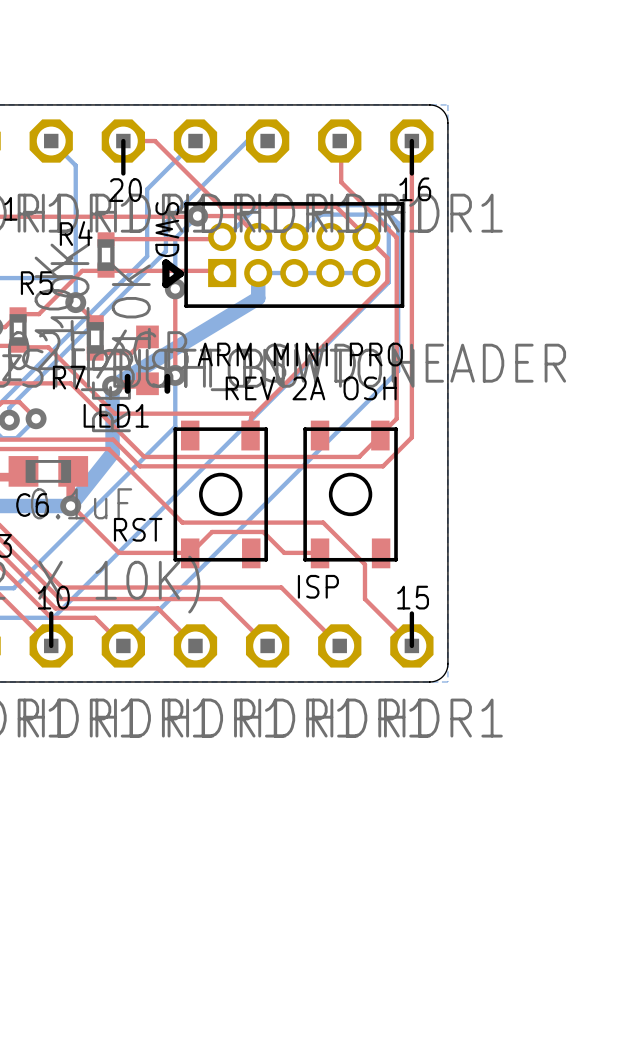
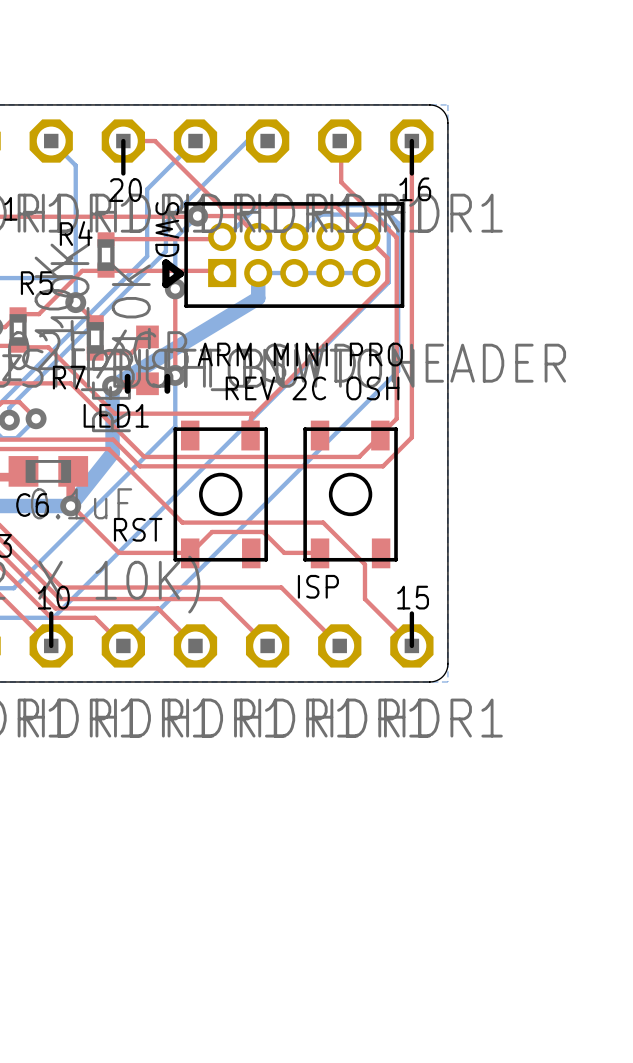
text: REV 2A OSH (311, 388) -> REV 2C OSH (312, 388)

